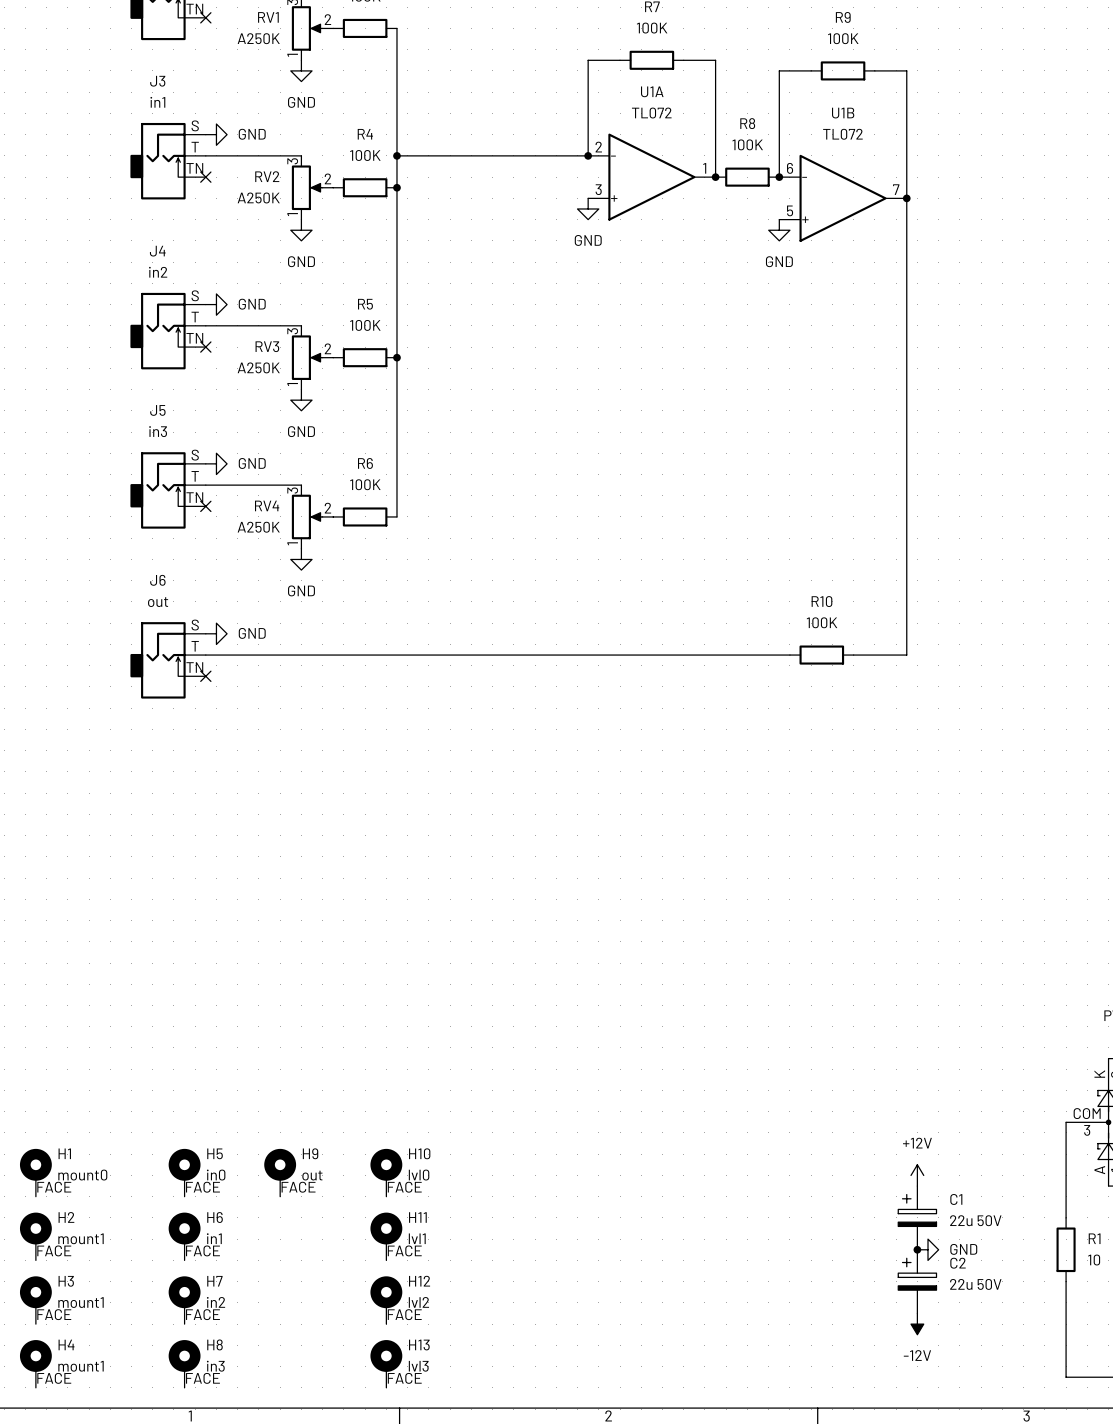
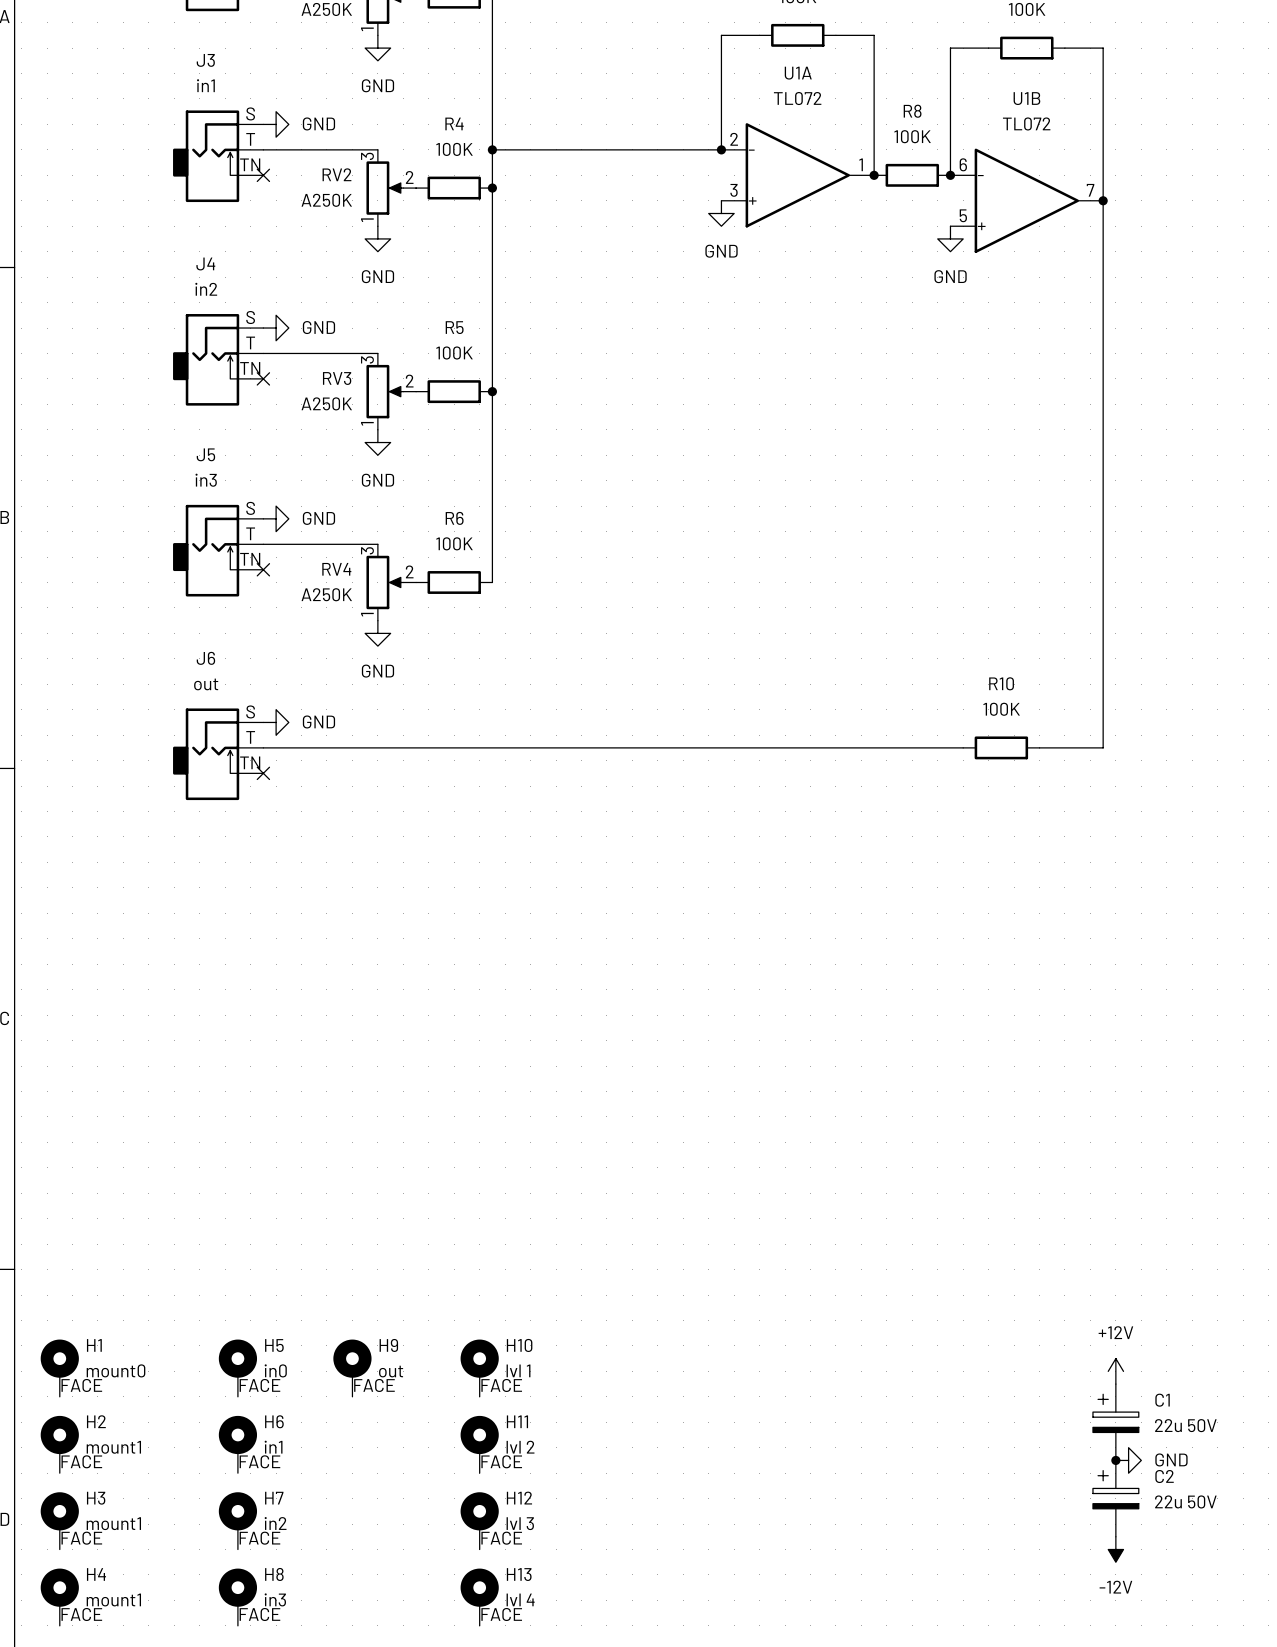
H10 value: lvl0 (419, 1175) -> lvl 1 (518, 1370)
H11 value: lvl1 (417, 1238) -> lvl 2 (520, 1447)
H12 value: lvl2 (418, 1302) -> lvl 3 (520, 1523)
H13 value: lvl3 (418, 1366) -> lvl 4 (520, 1599)

